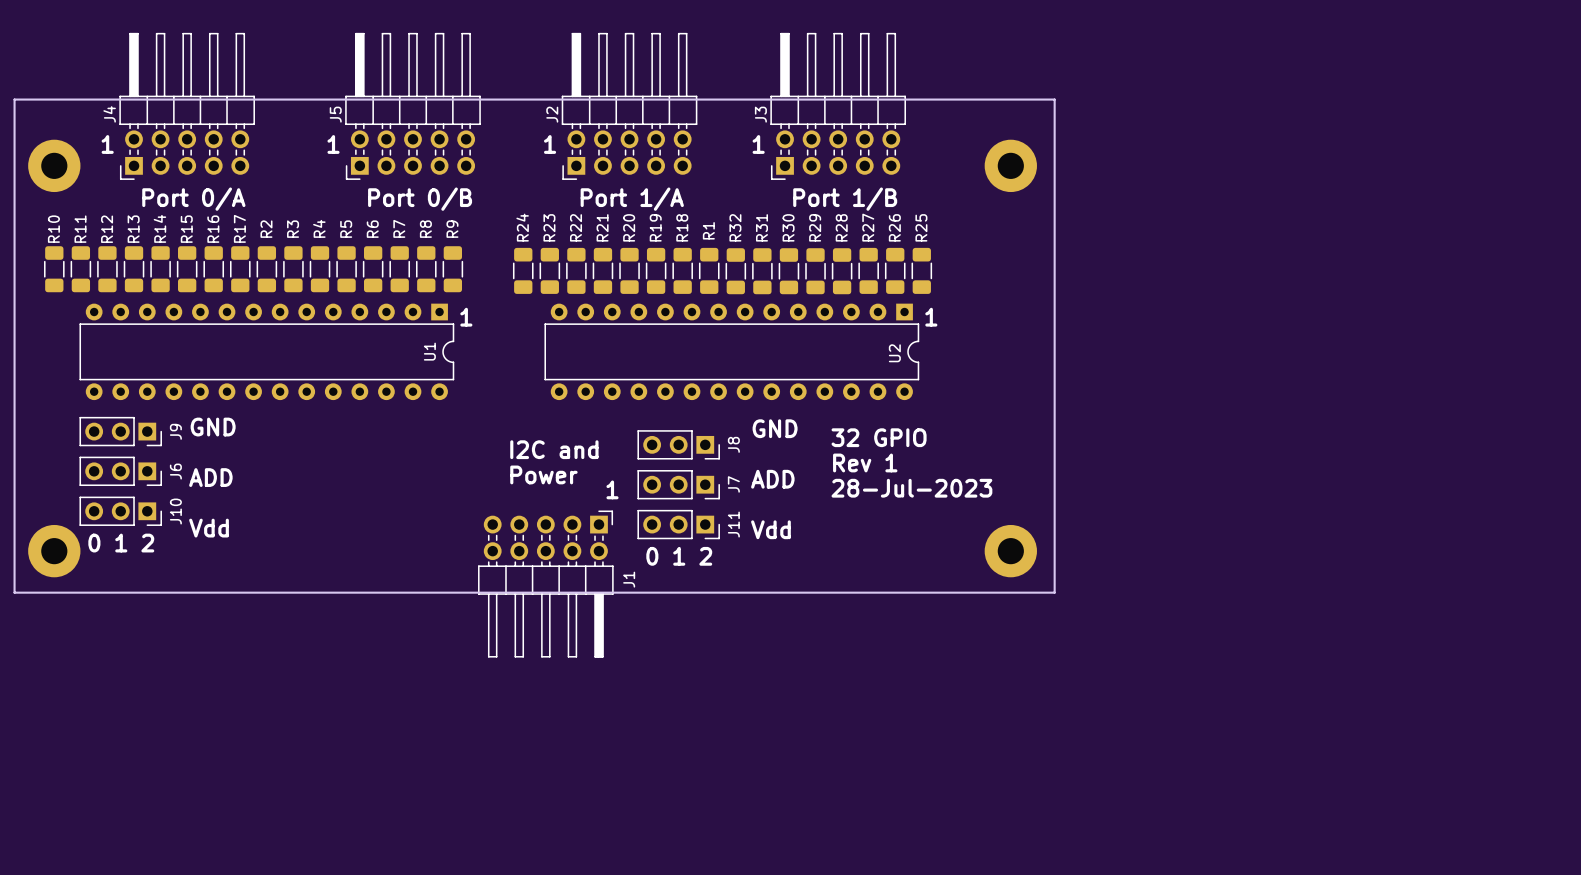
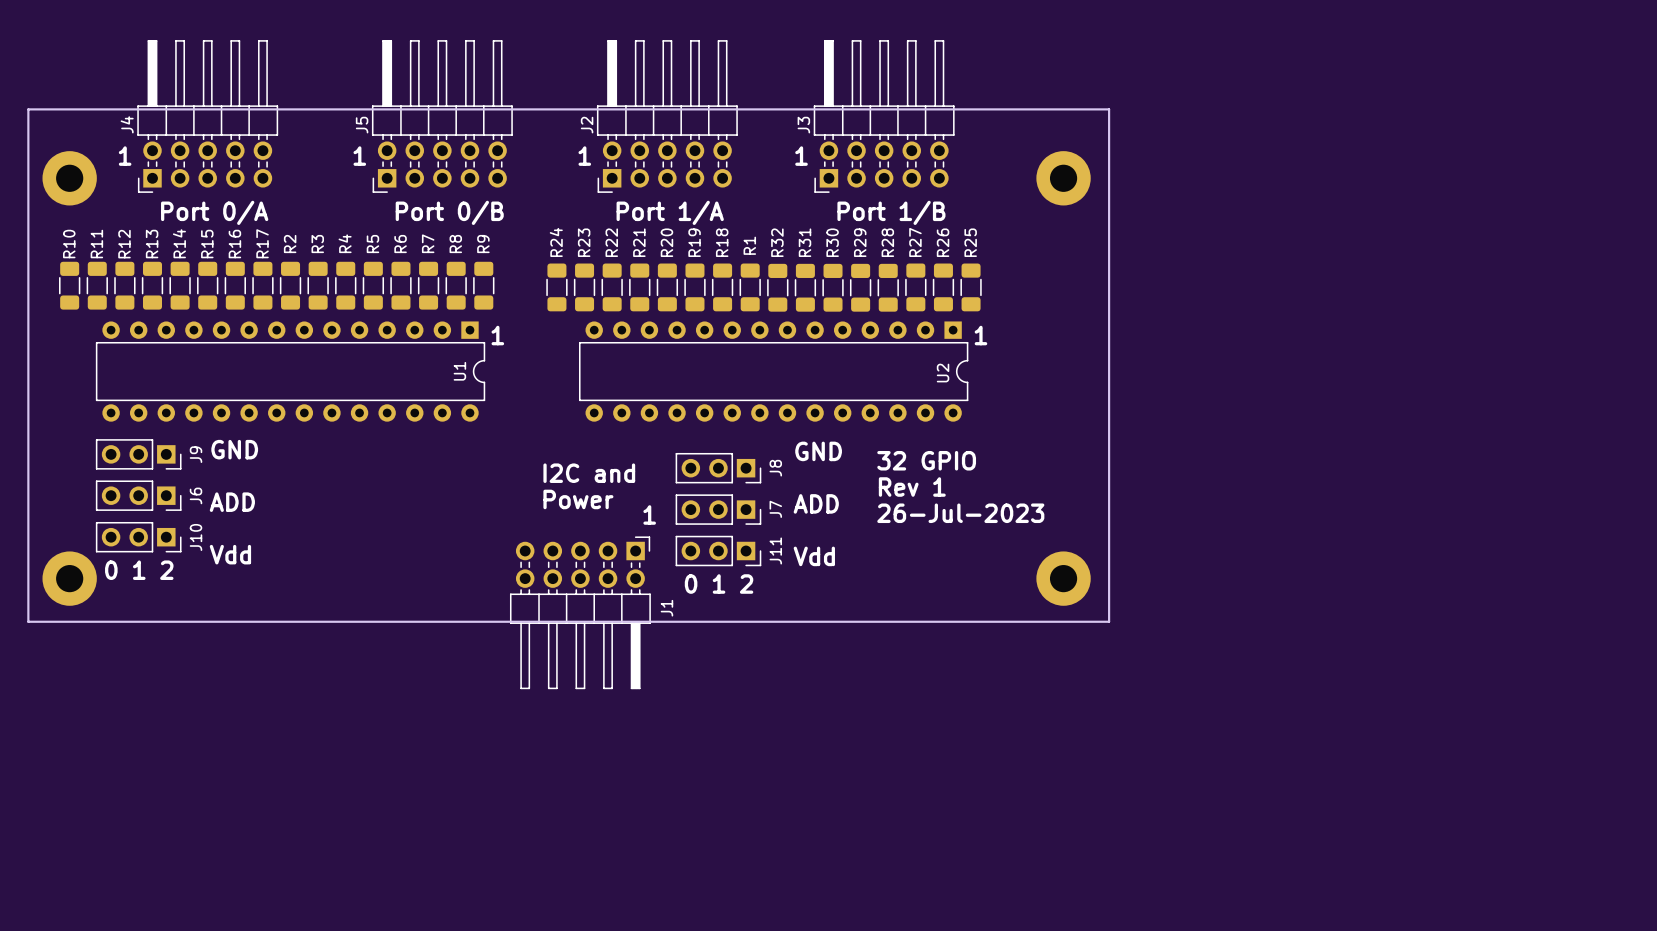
text: 28-Jul-2023 (911, 488) -> 26-Jul-2023 (960, 513)

